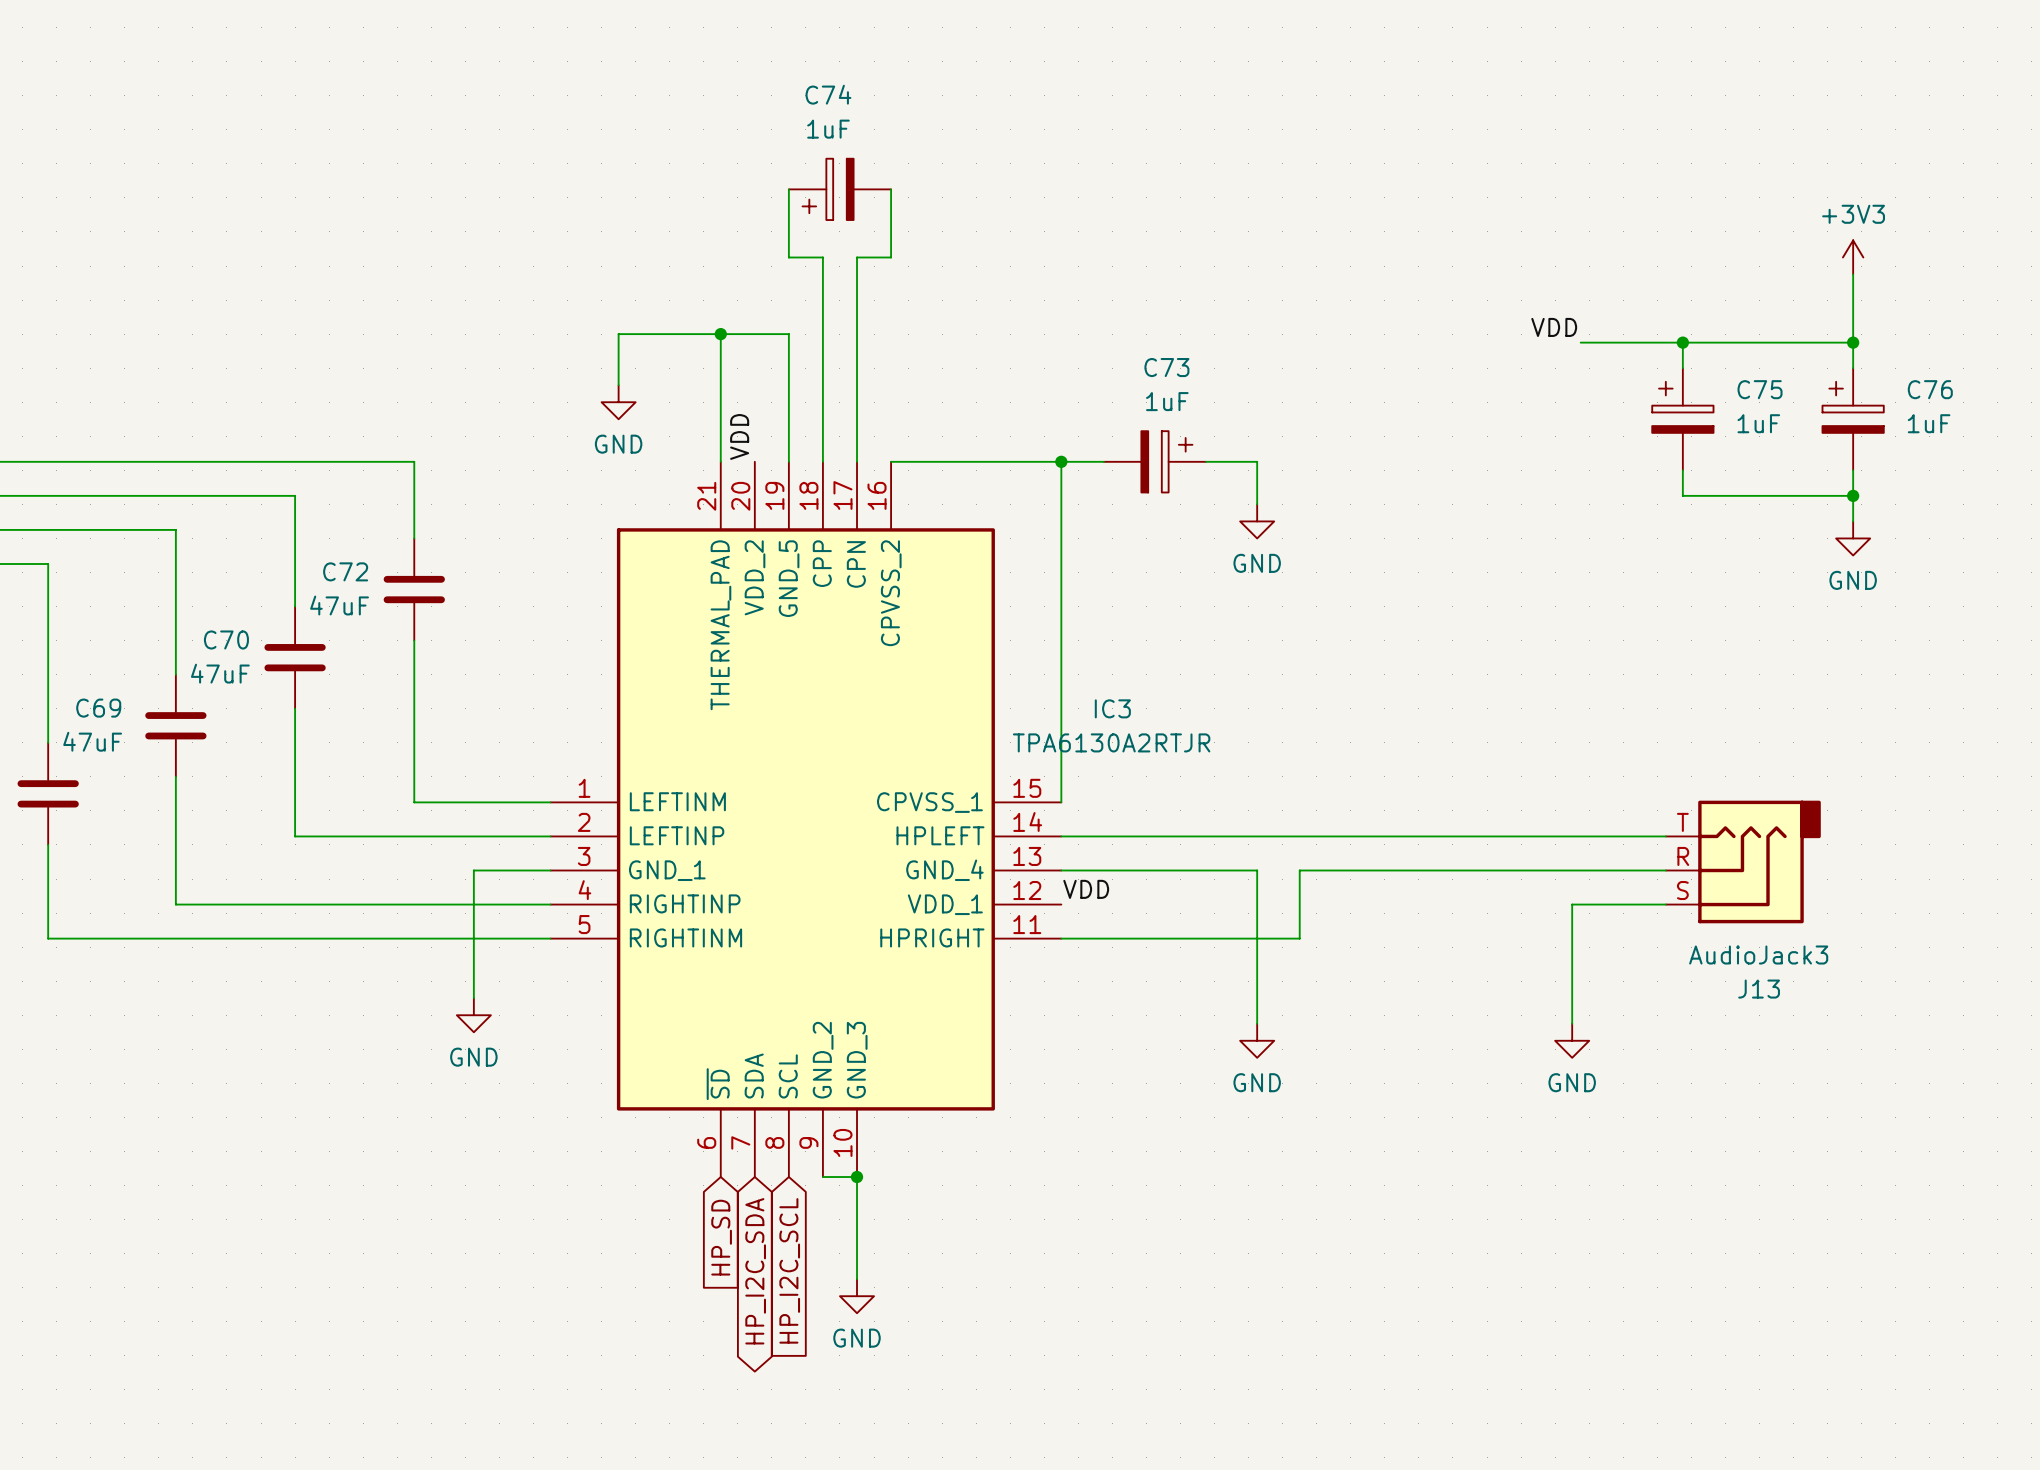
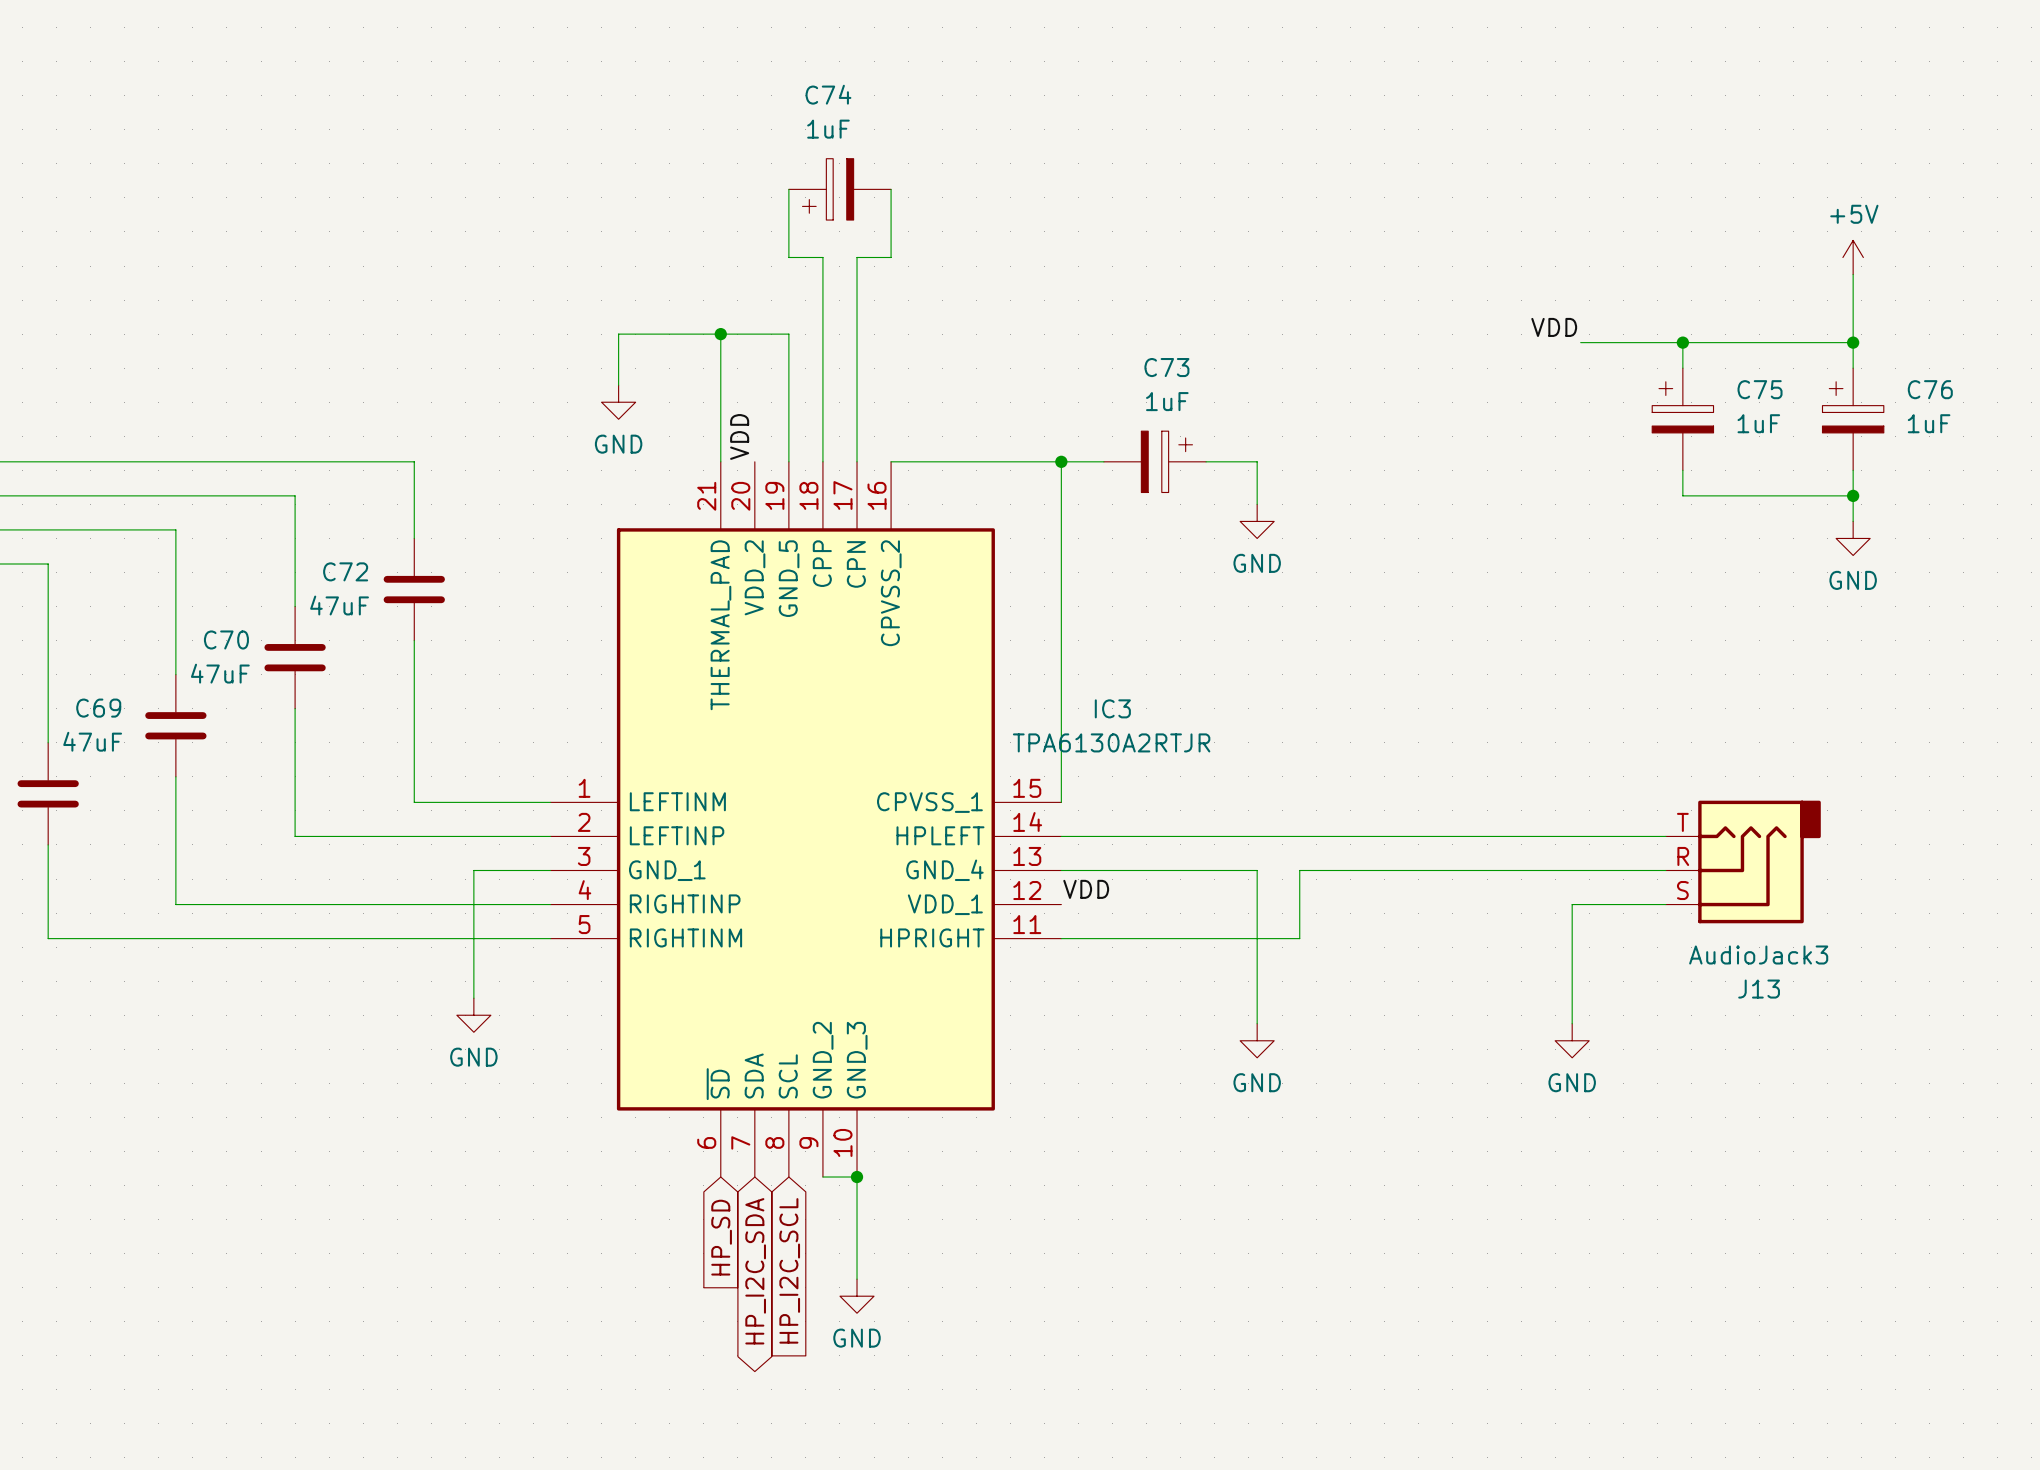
power symbol: +3V3 (1853, 257) -> +5V (1853, 257)

